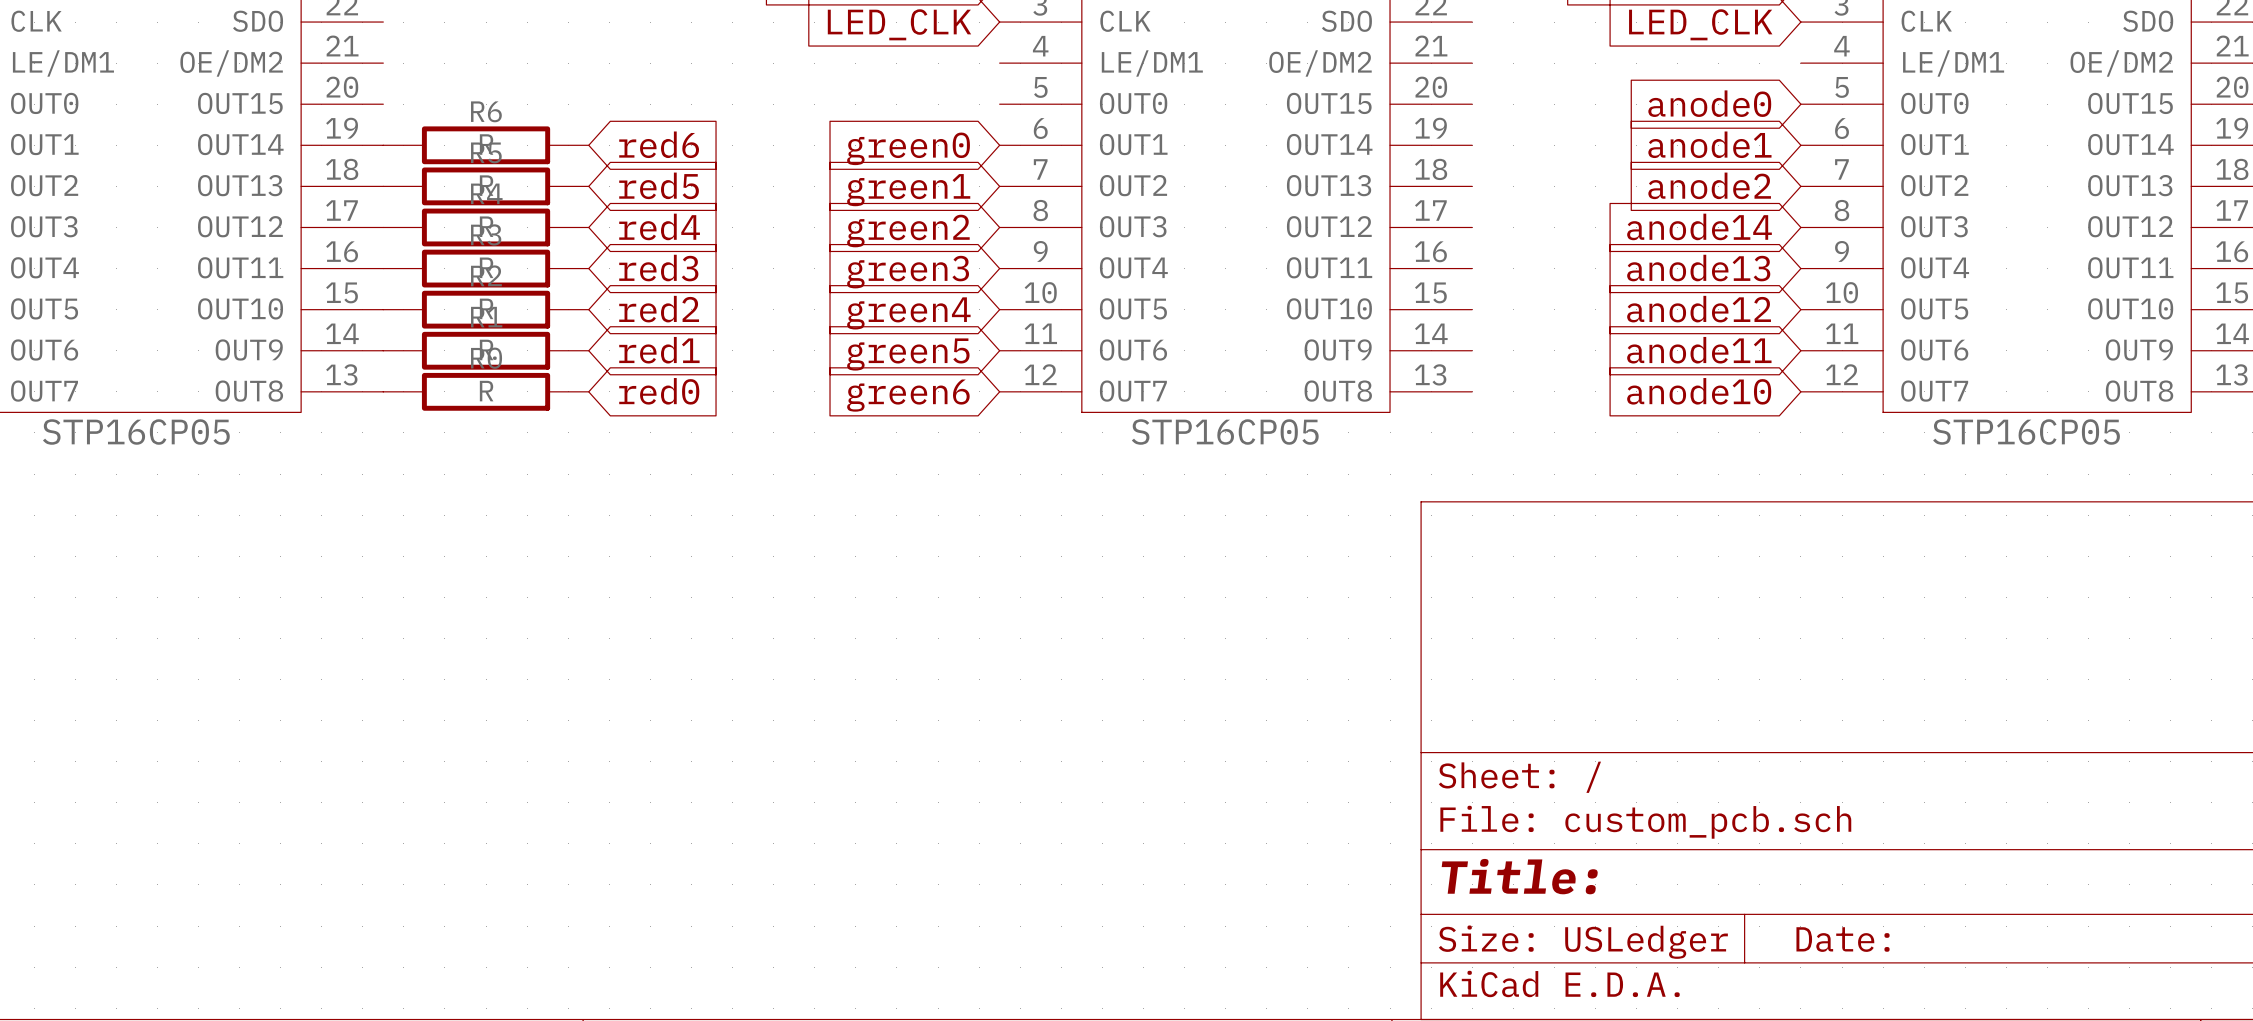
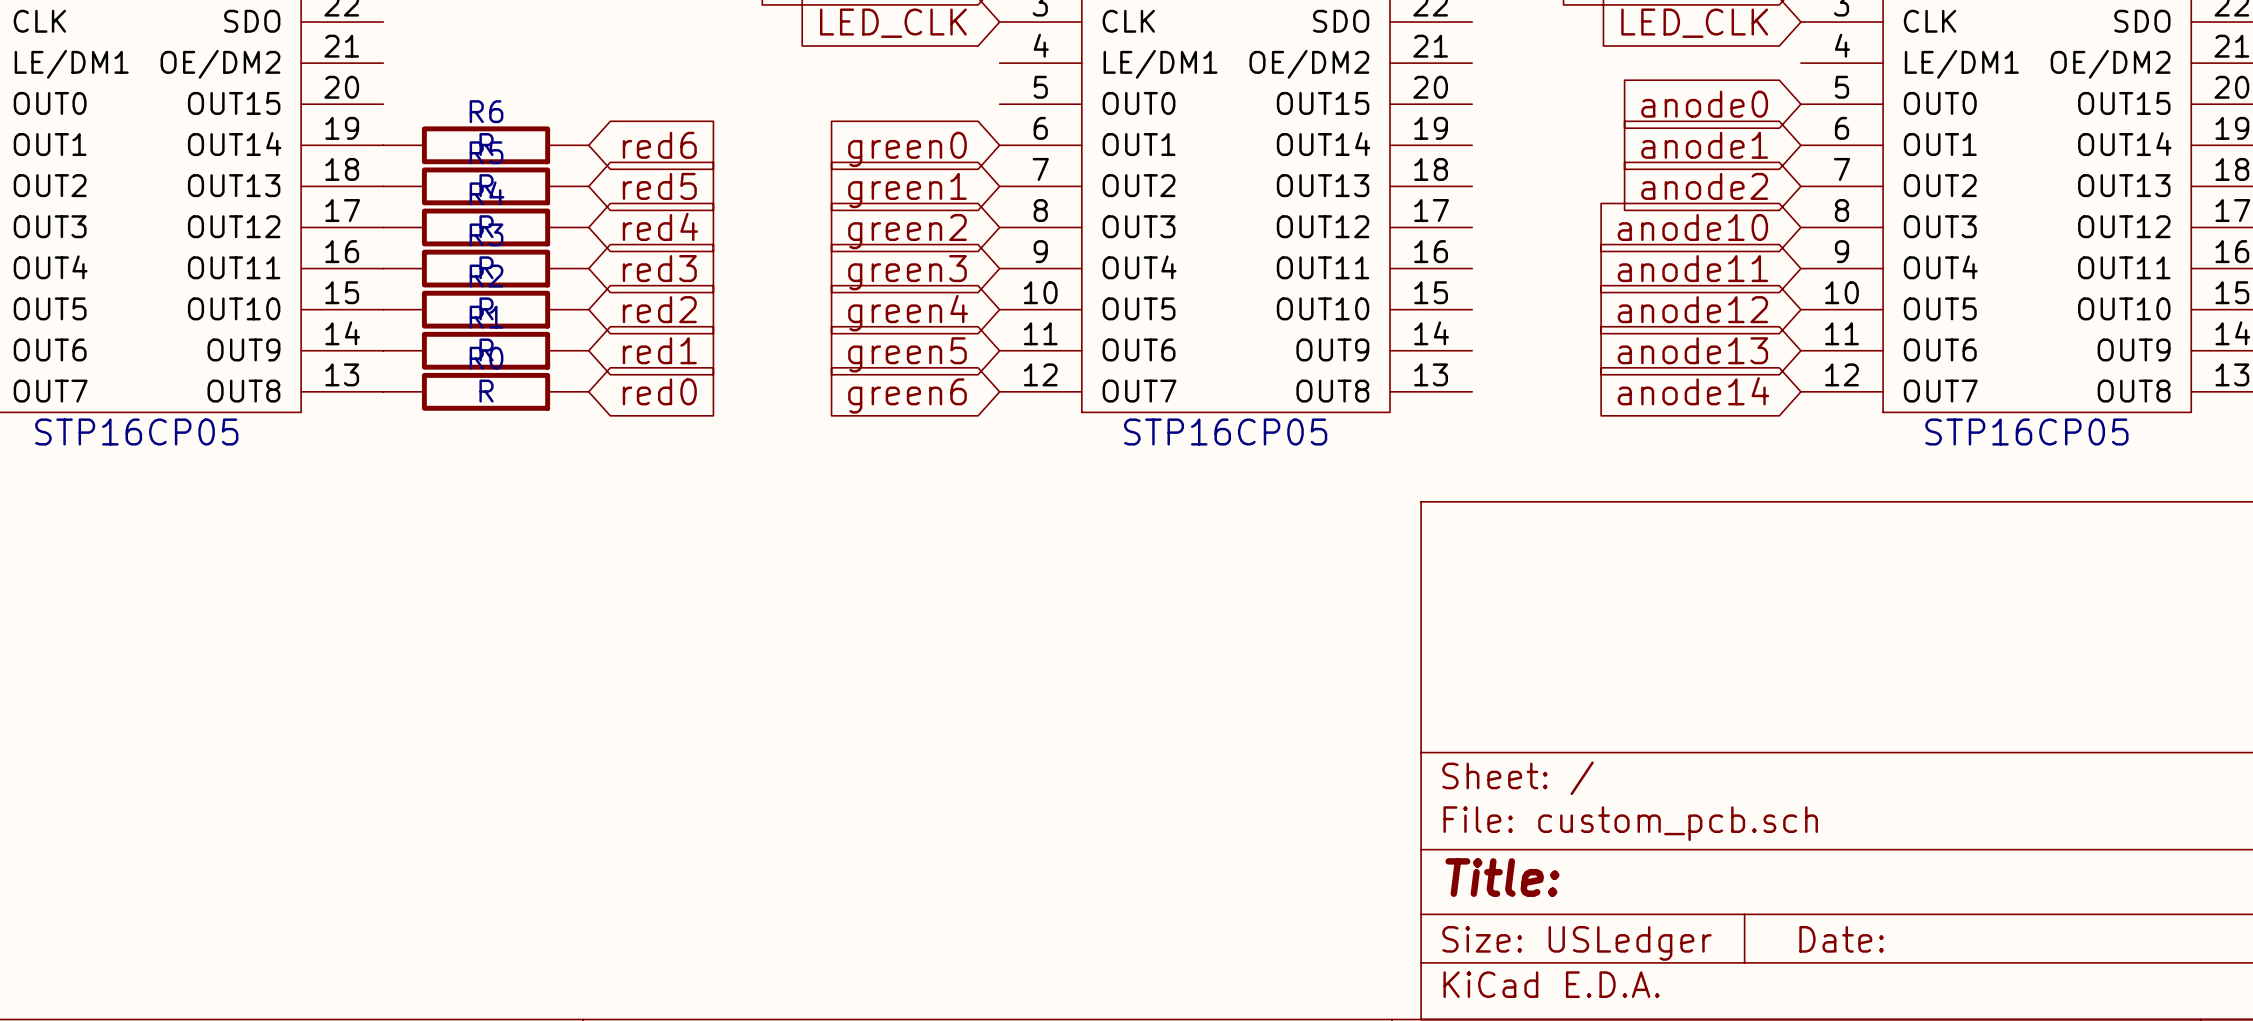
global label: anode14 (1699, 226) -> anode10 (1692, 227)
global label: anode13 (1698, 268) -> anode11 (1692, 268)
global label: anode11 (1699, 350) -> anode13 (1692, 350)
global label: anode10 (1699, 391) -> anode14 (1693, 391)

